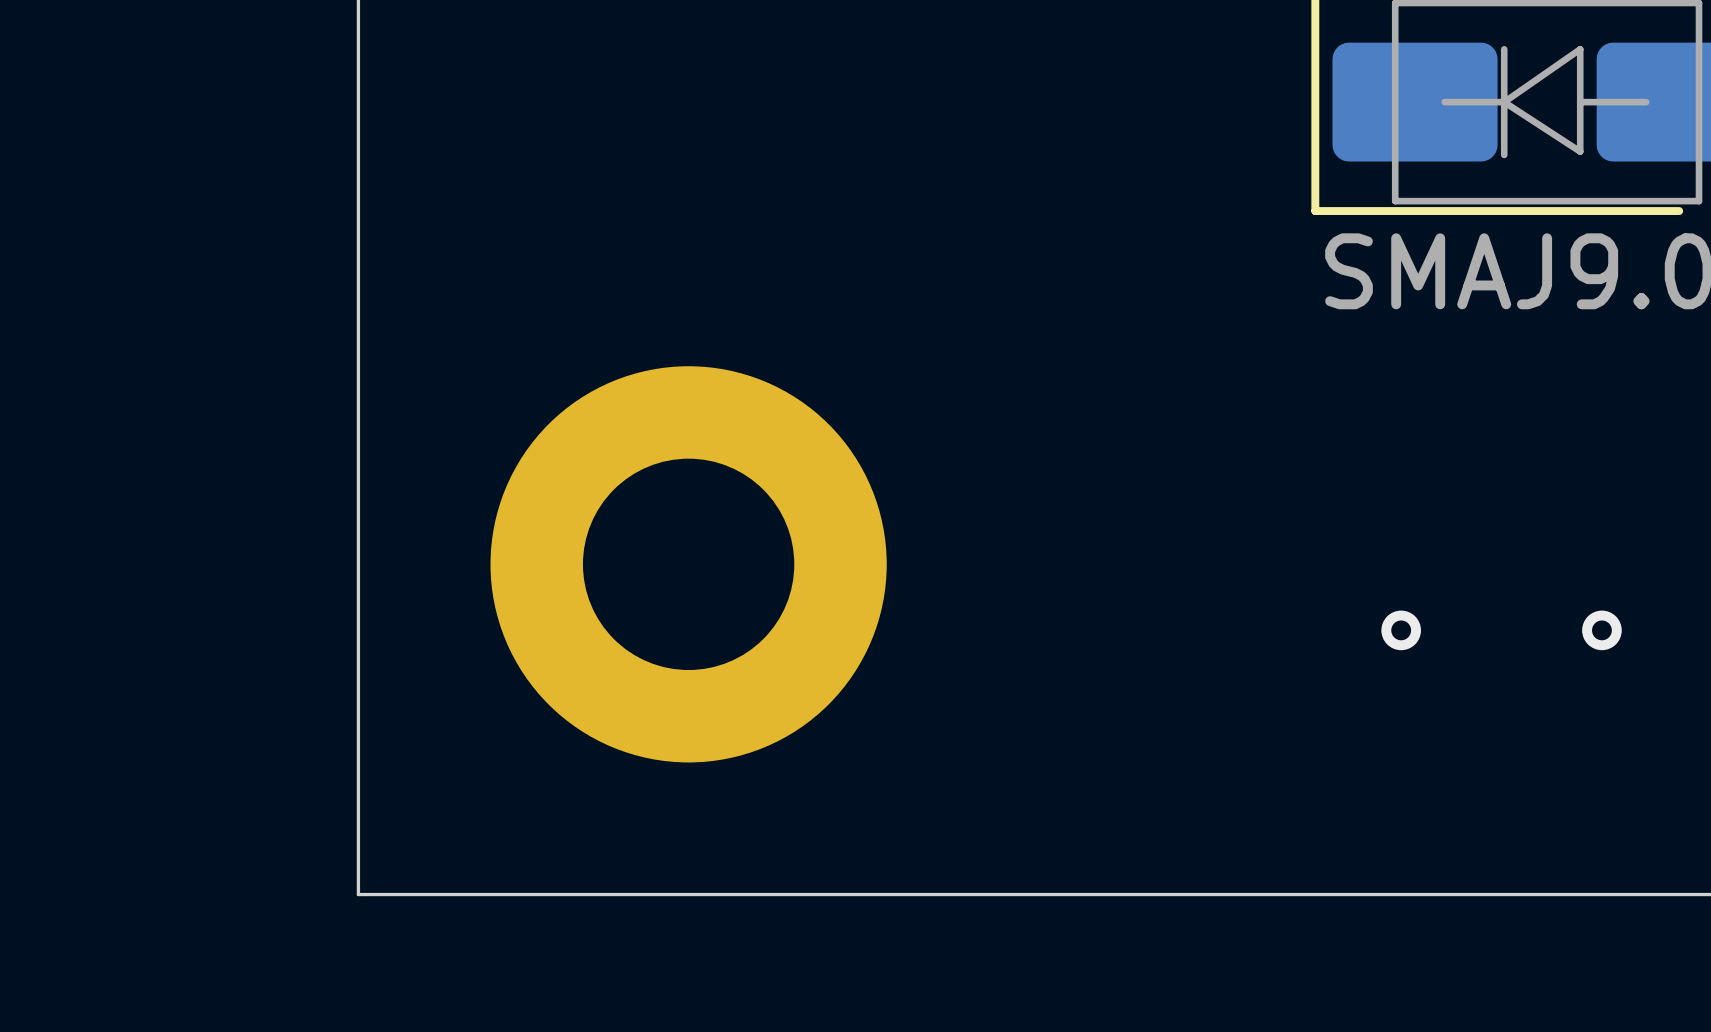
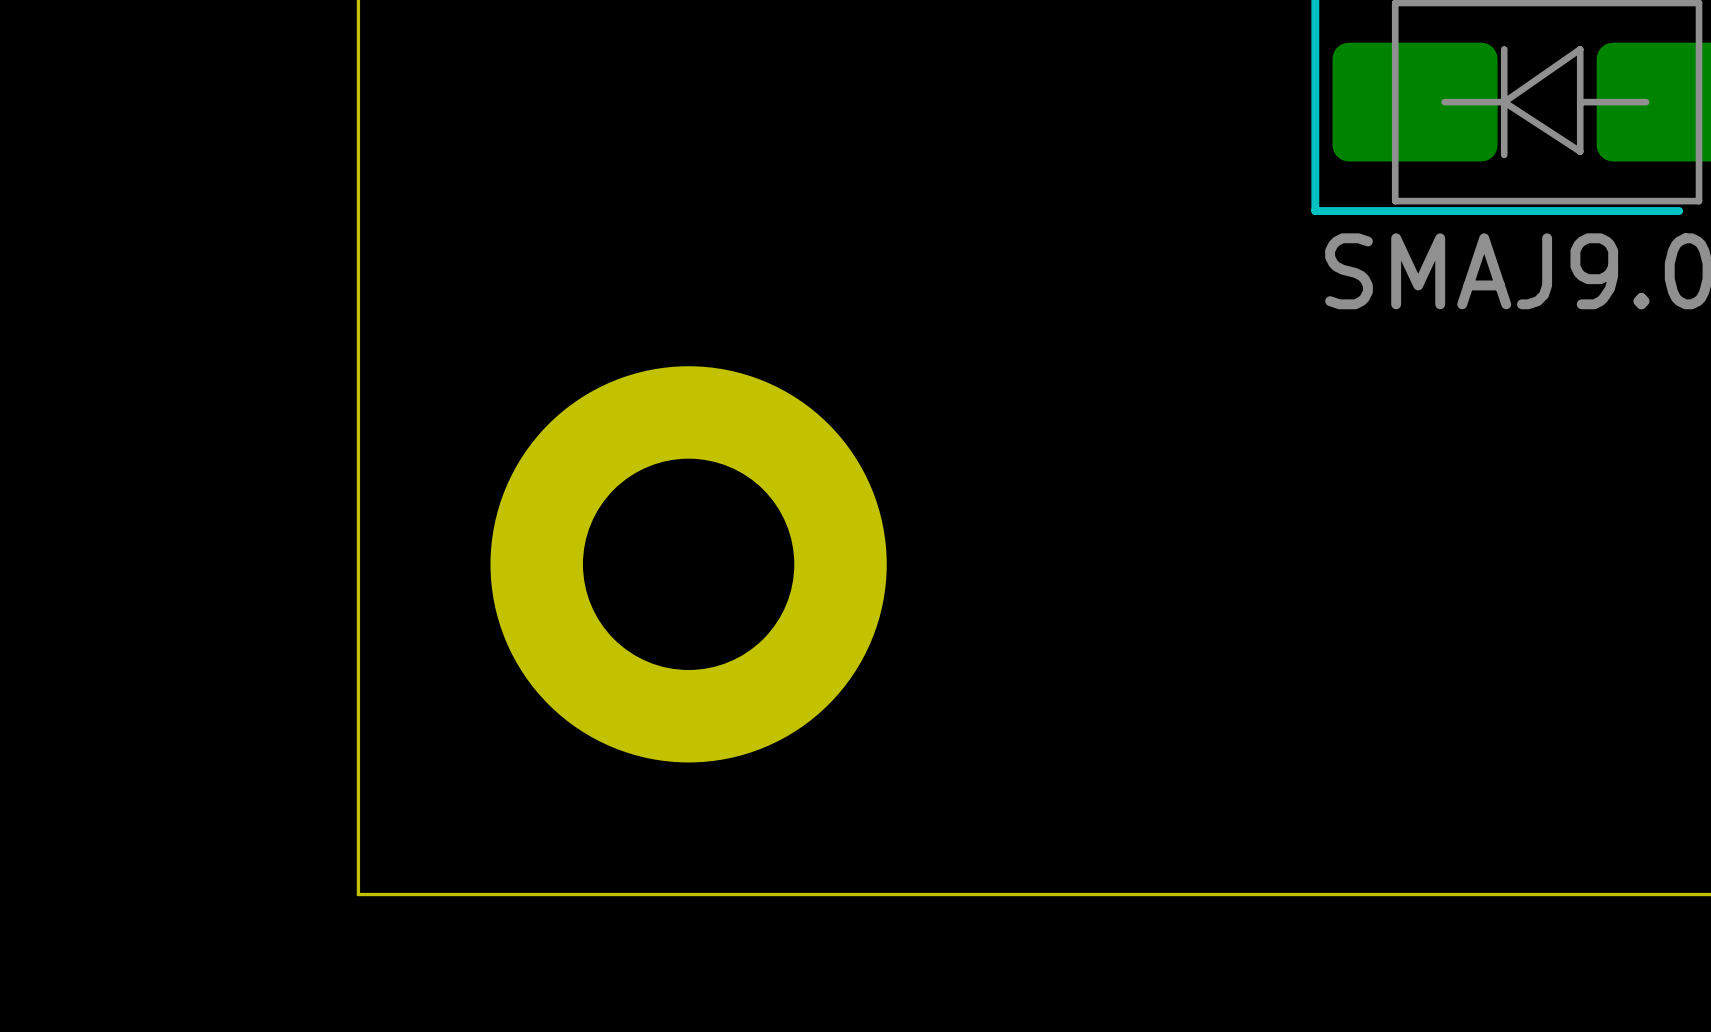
via: (1401, 630) -> none
via: (1601, 630) -> none

